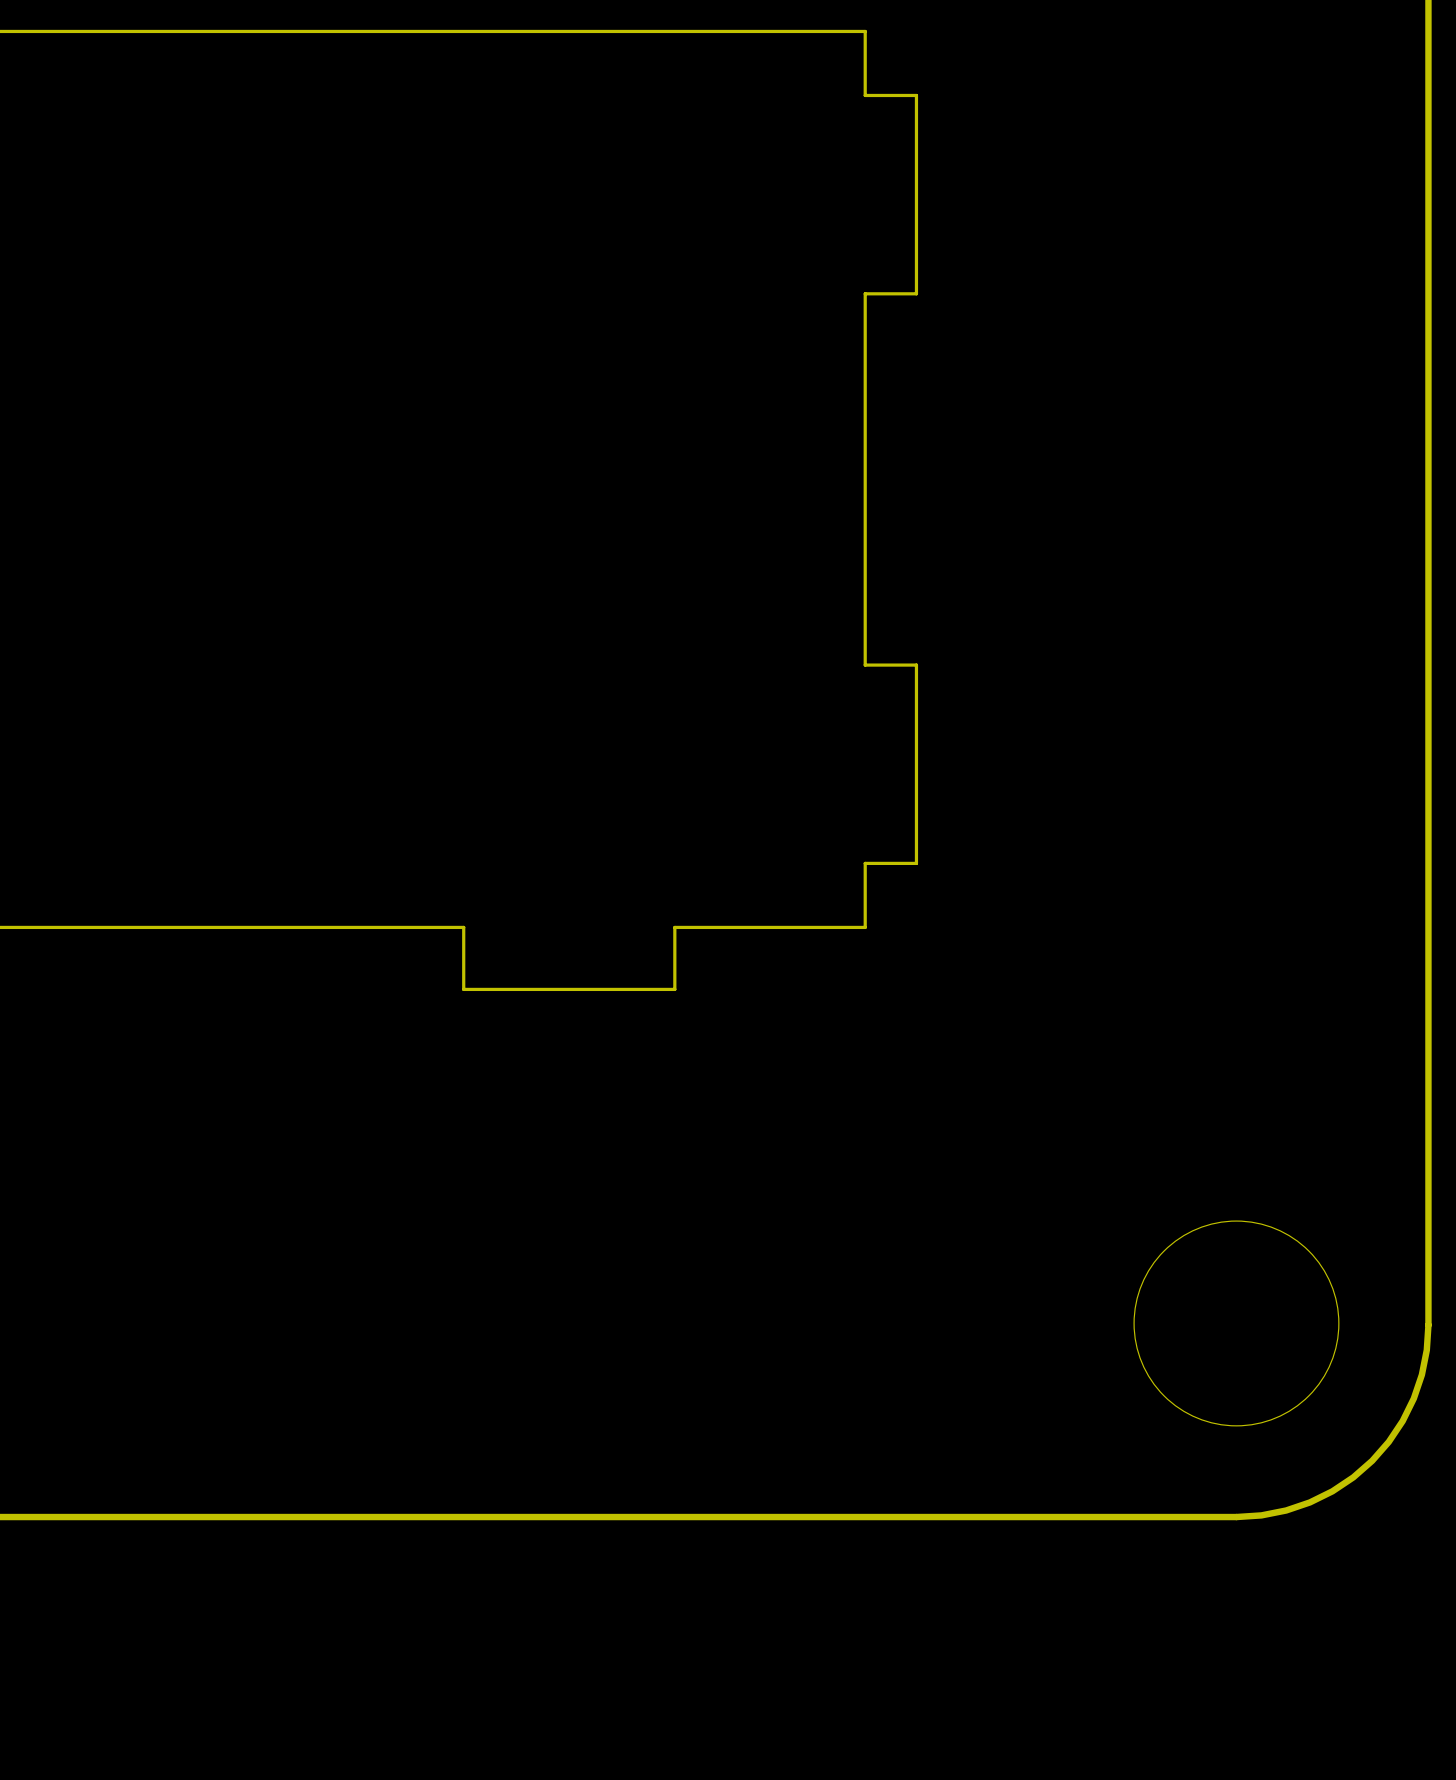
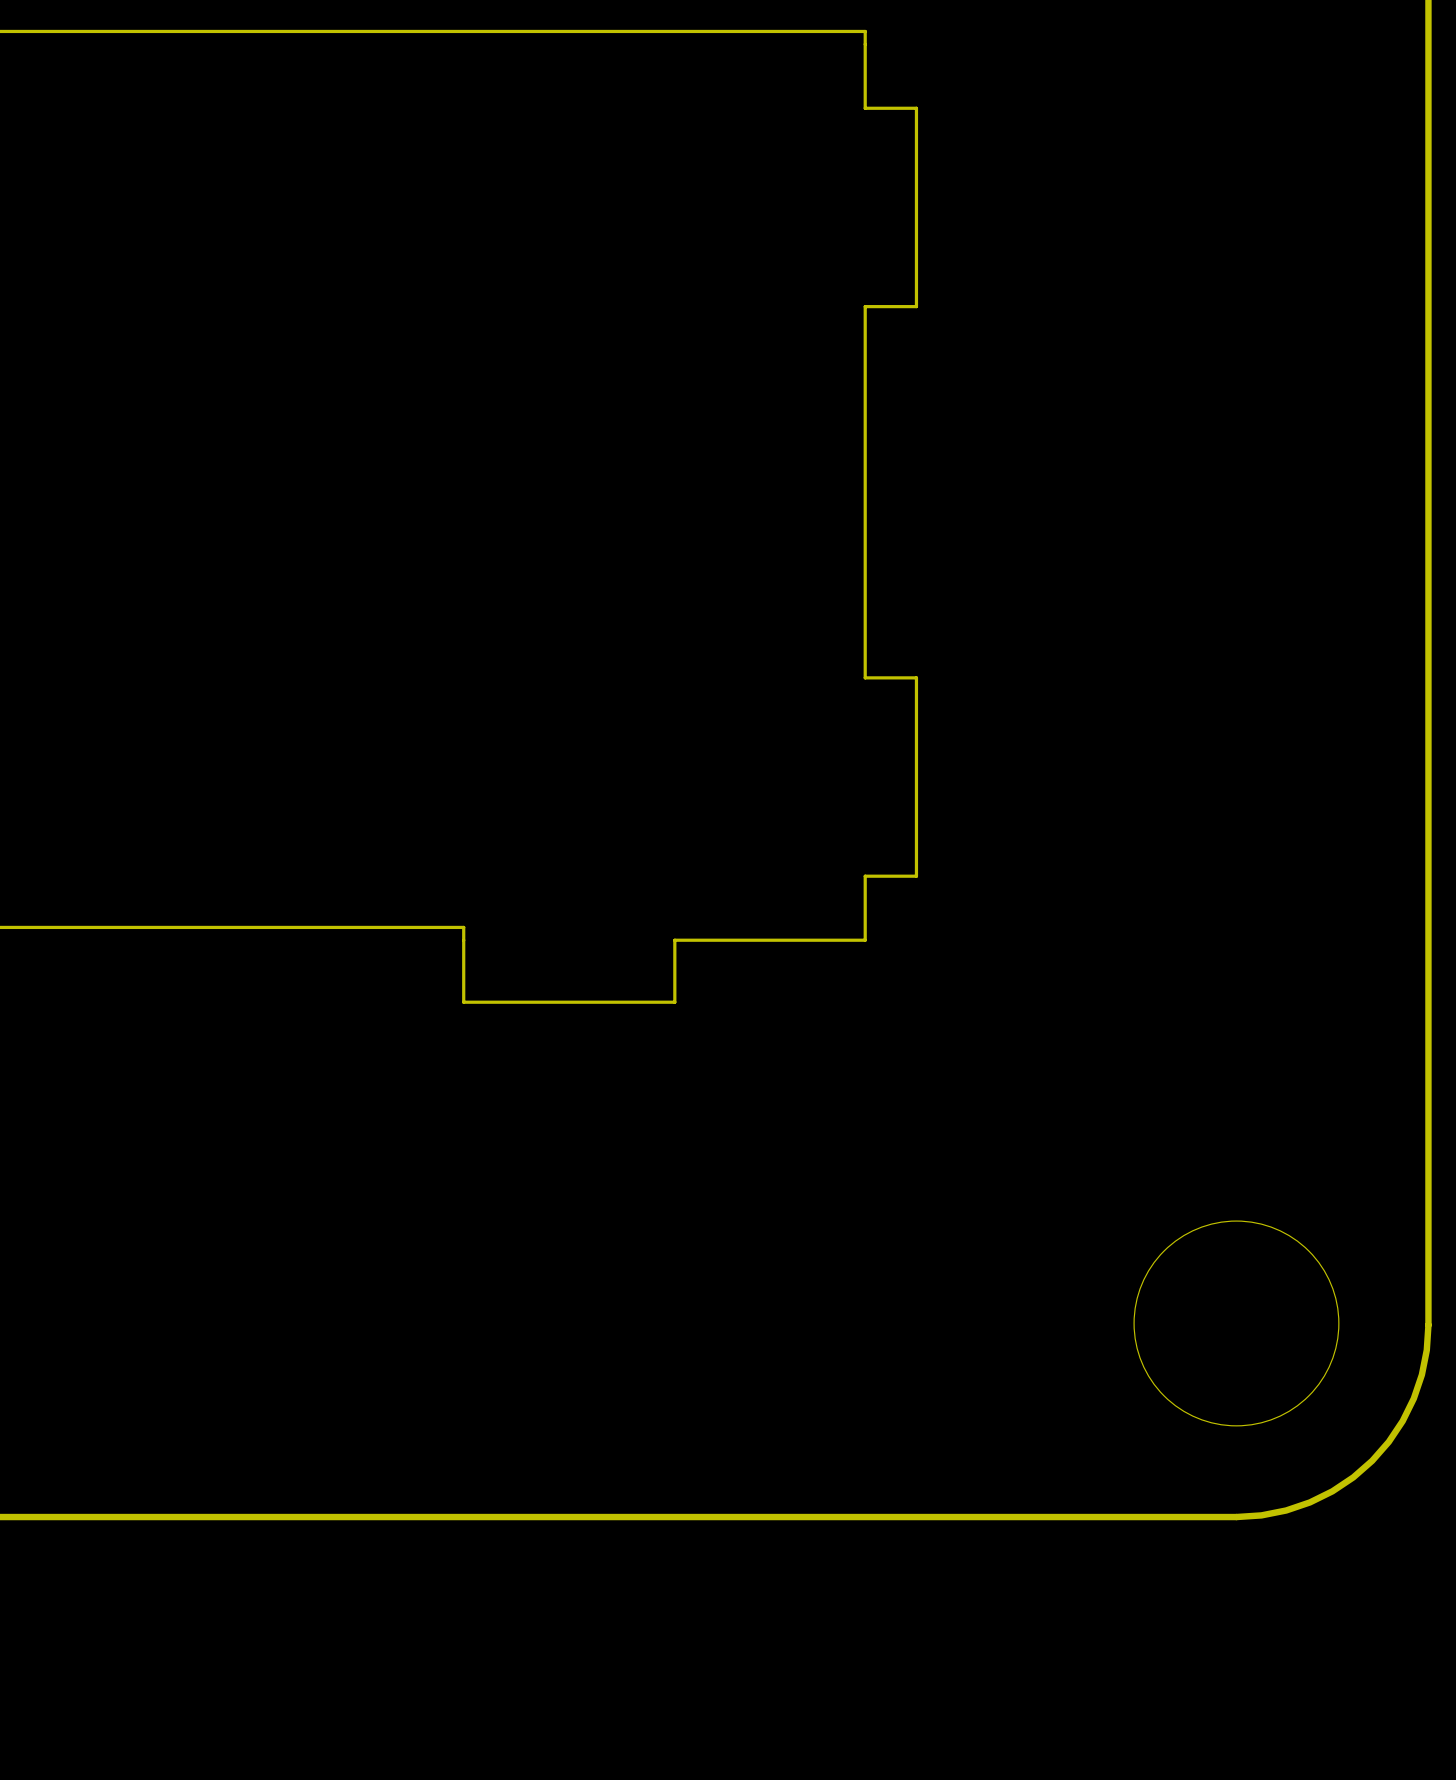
board edge: (865, 95) (916, 95) (916, 108) -> (865, 95) (865, 108) (916, 108)
board edge: (916, 293) (865, 293) (865, 306) -> (916, 293) (916, 306) (865, 306)
board edge: (865, 665) (916, 665) (916, 677) -> (865, 665) (865, 677) (916, 677)
board edge: (916, 863) (865, 863) (865, 876) -> (916, 863) (916, 876) (865, 876)
board edge: (865, 927) (674, 927) (674, 940) -> (865, 927) (865, 940) (674, 940)
board edge: (674, 989) (463, 989) -> (674, 989) (674, 1002) (463, 1002) (463, 989)

